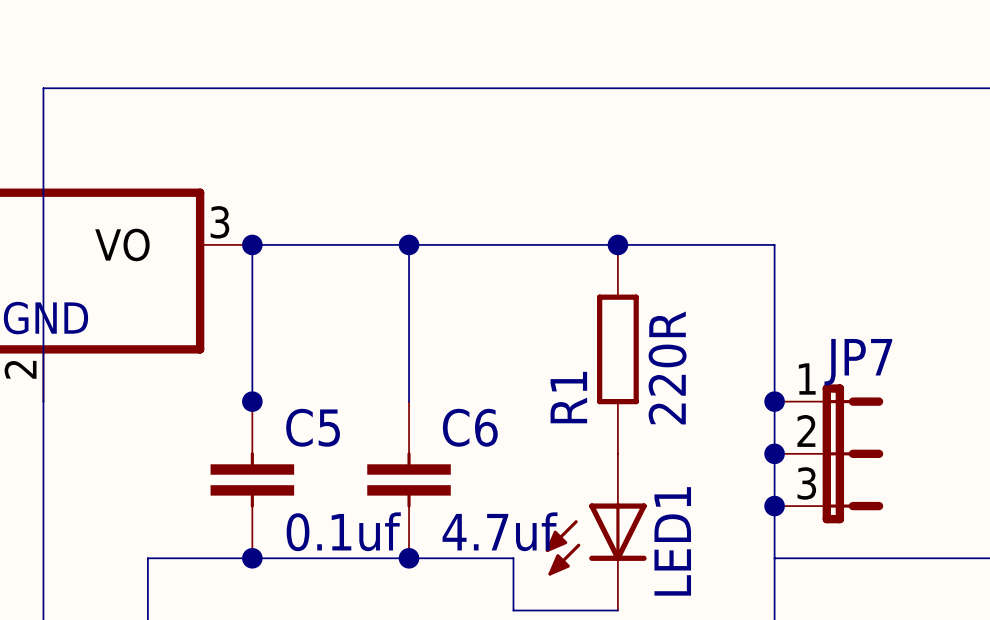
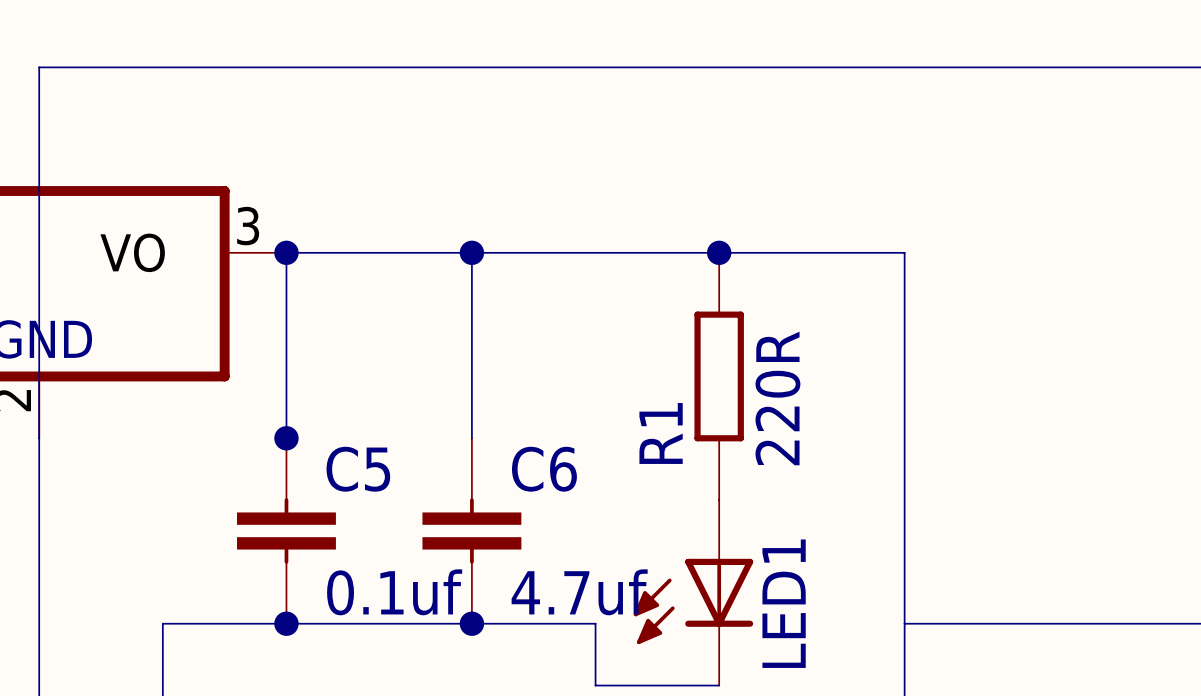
junction: (774, 401) -> none
junction: (774, 453) -> none
JP7: (828, 453) -> none
junction: (774, 506) -> none

